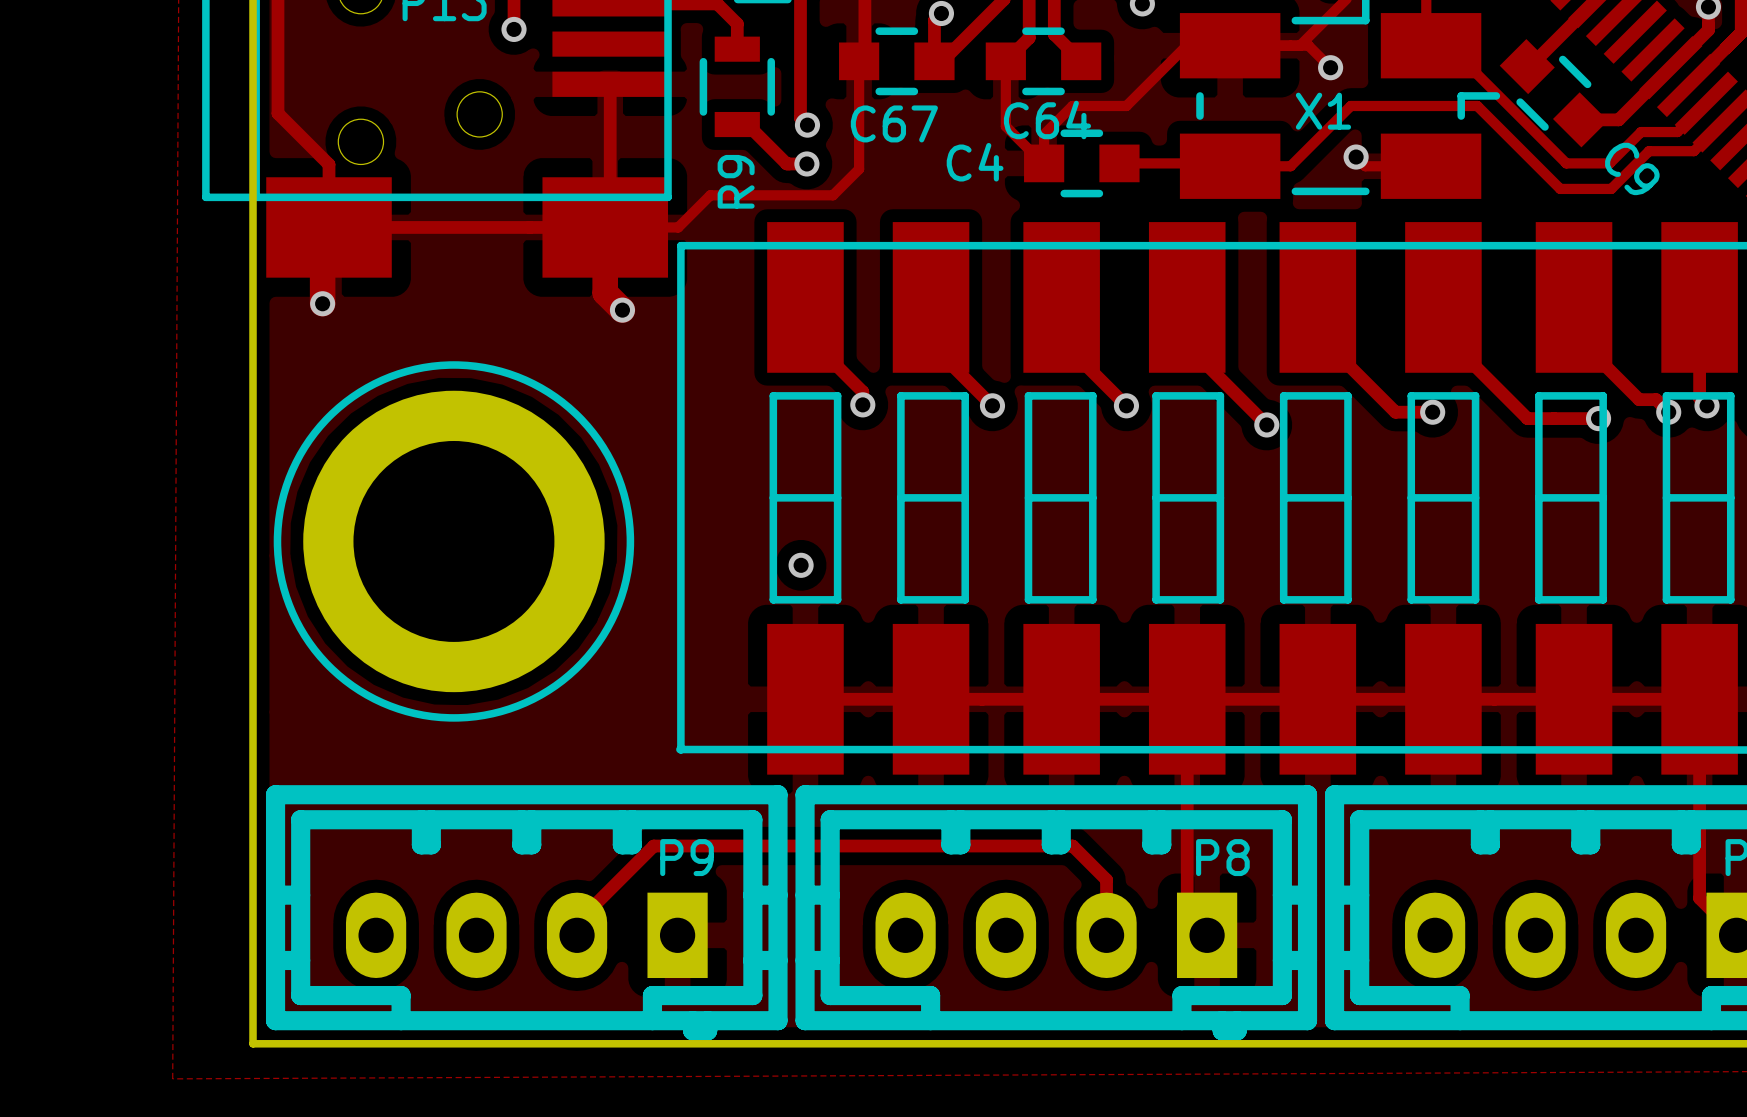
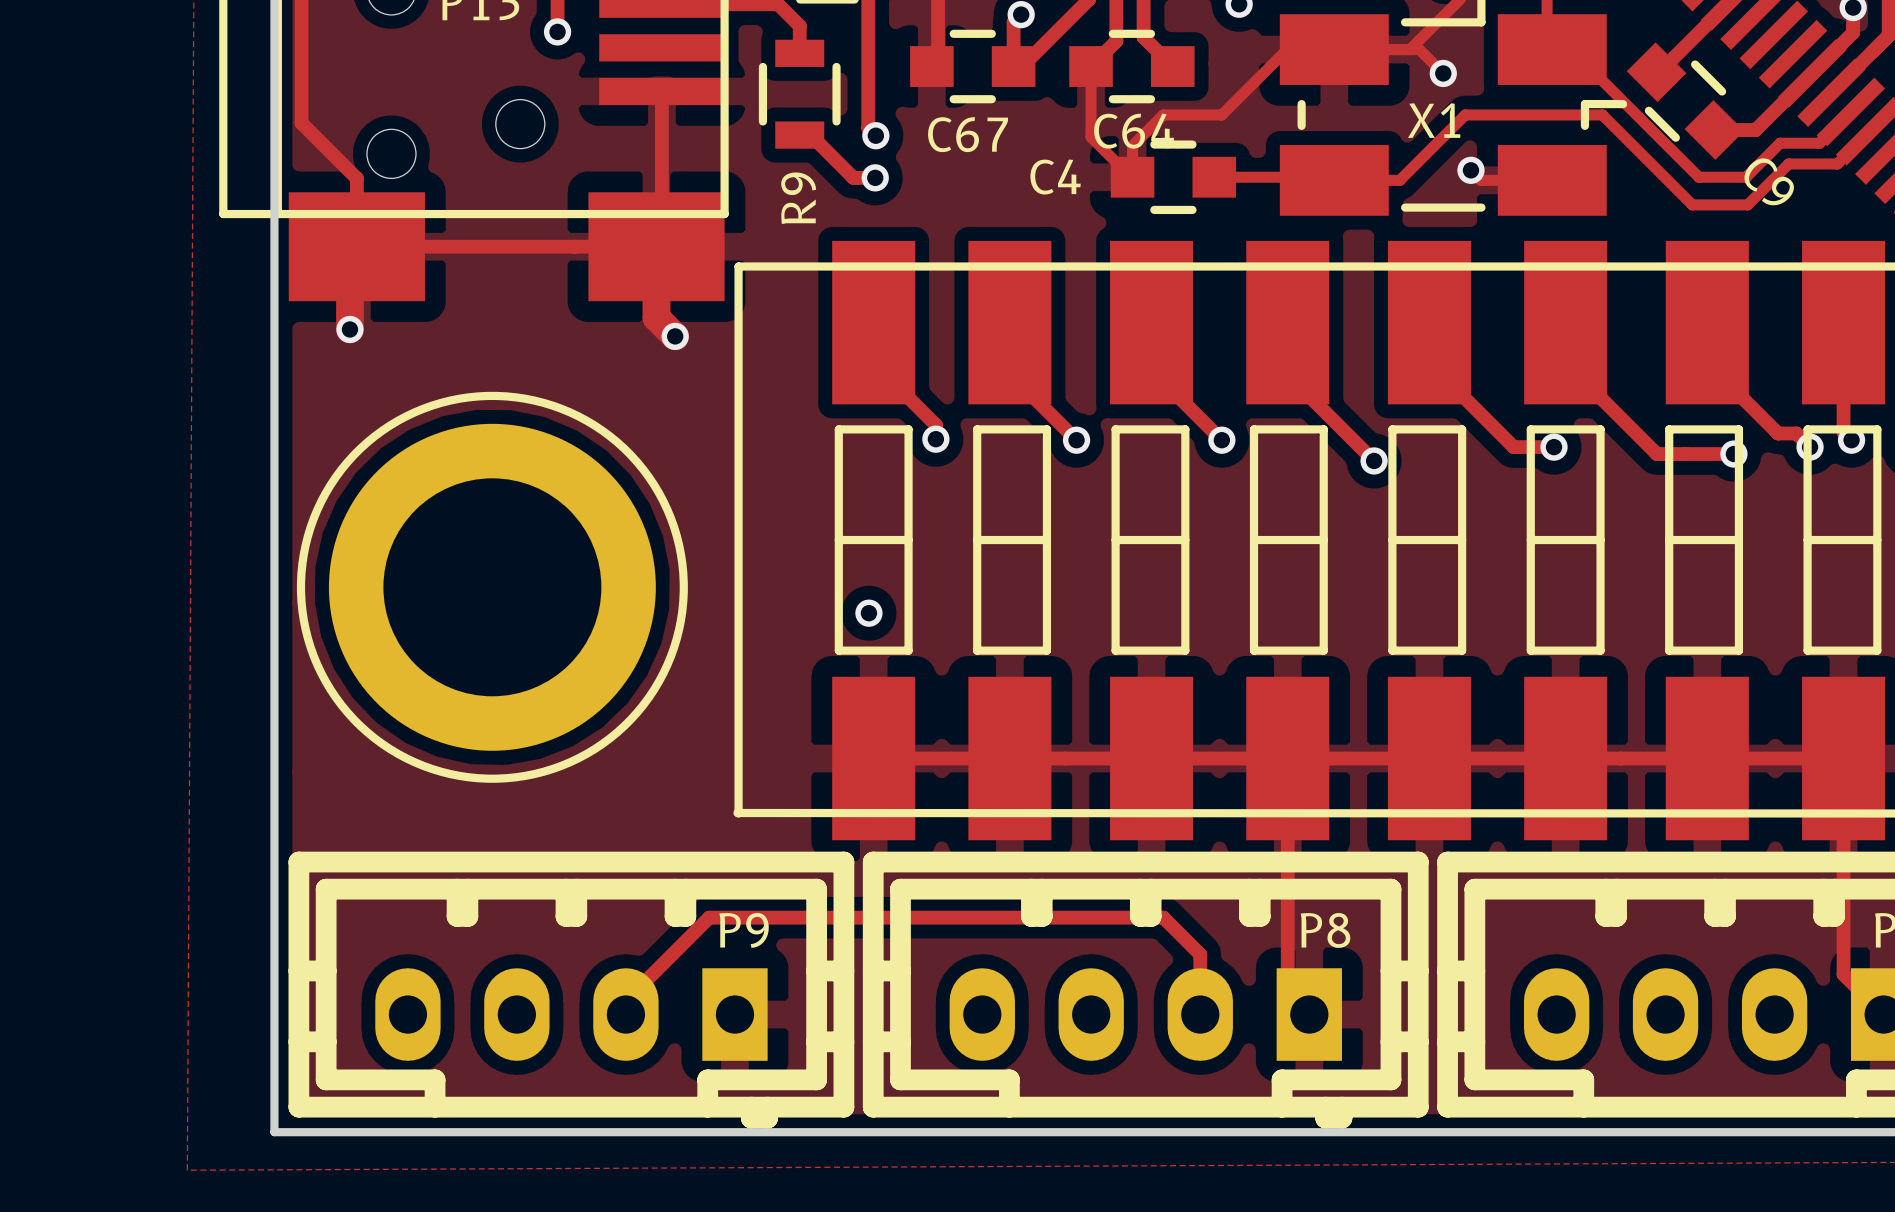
track: (859, 61) (859, 169) (832, 195) (710, 195) (678, 227) (605, 227) -> none

